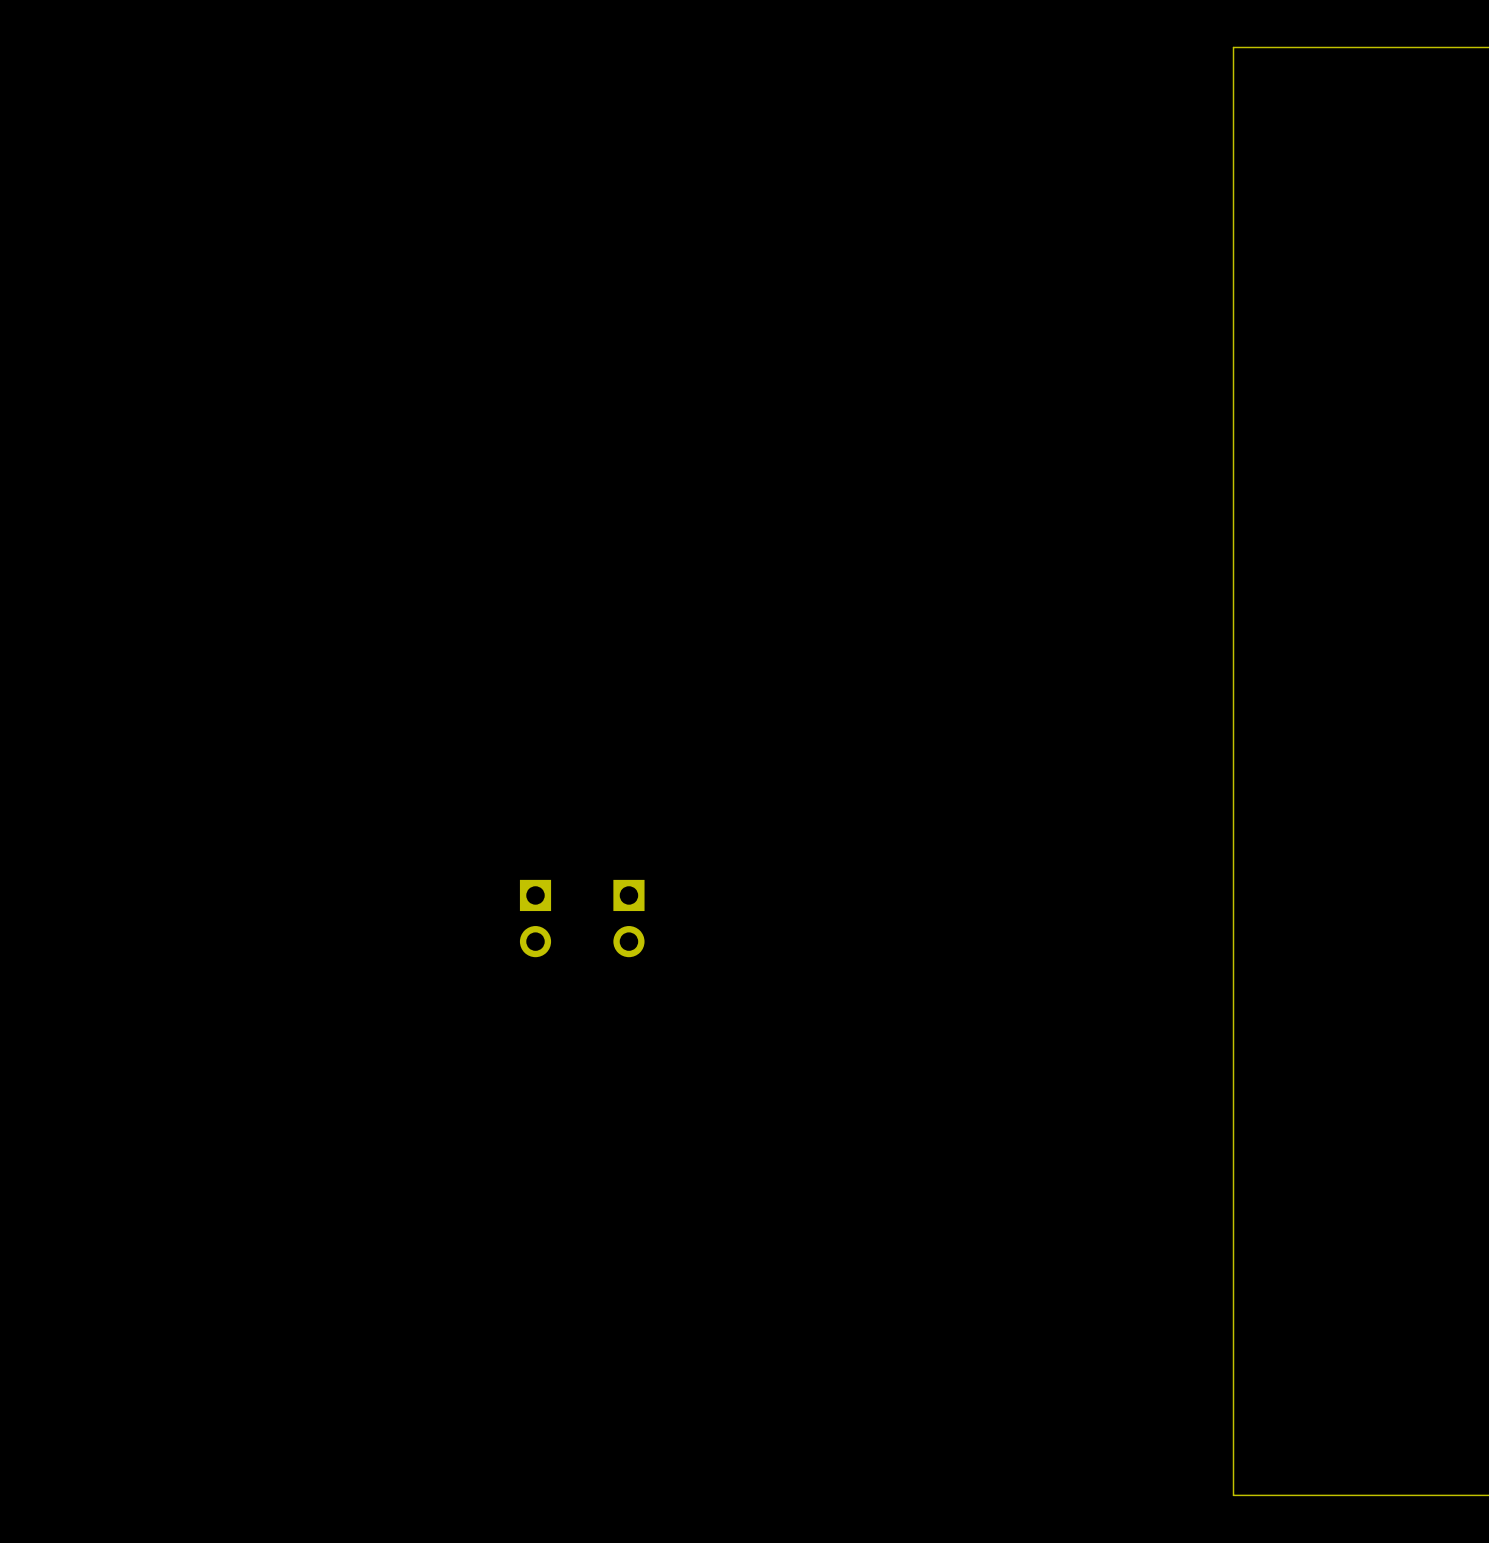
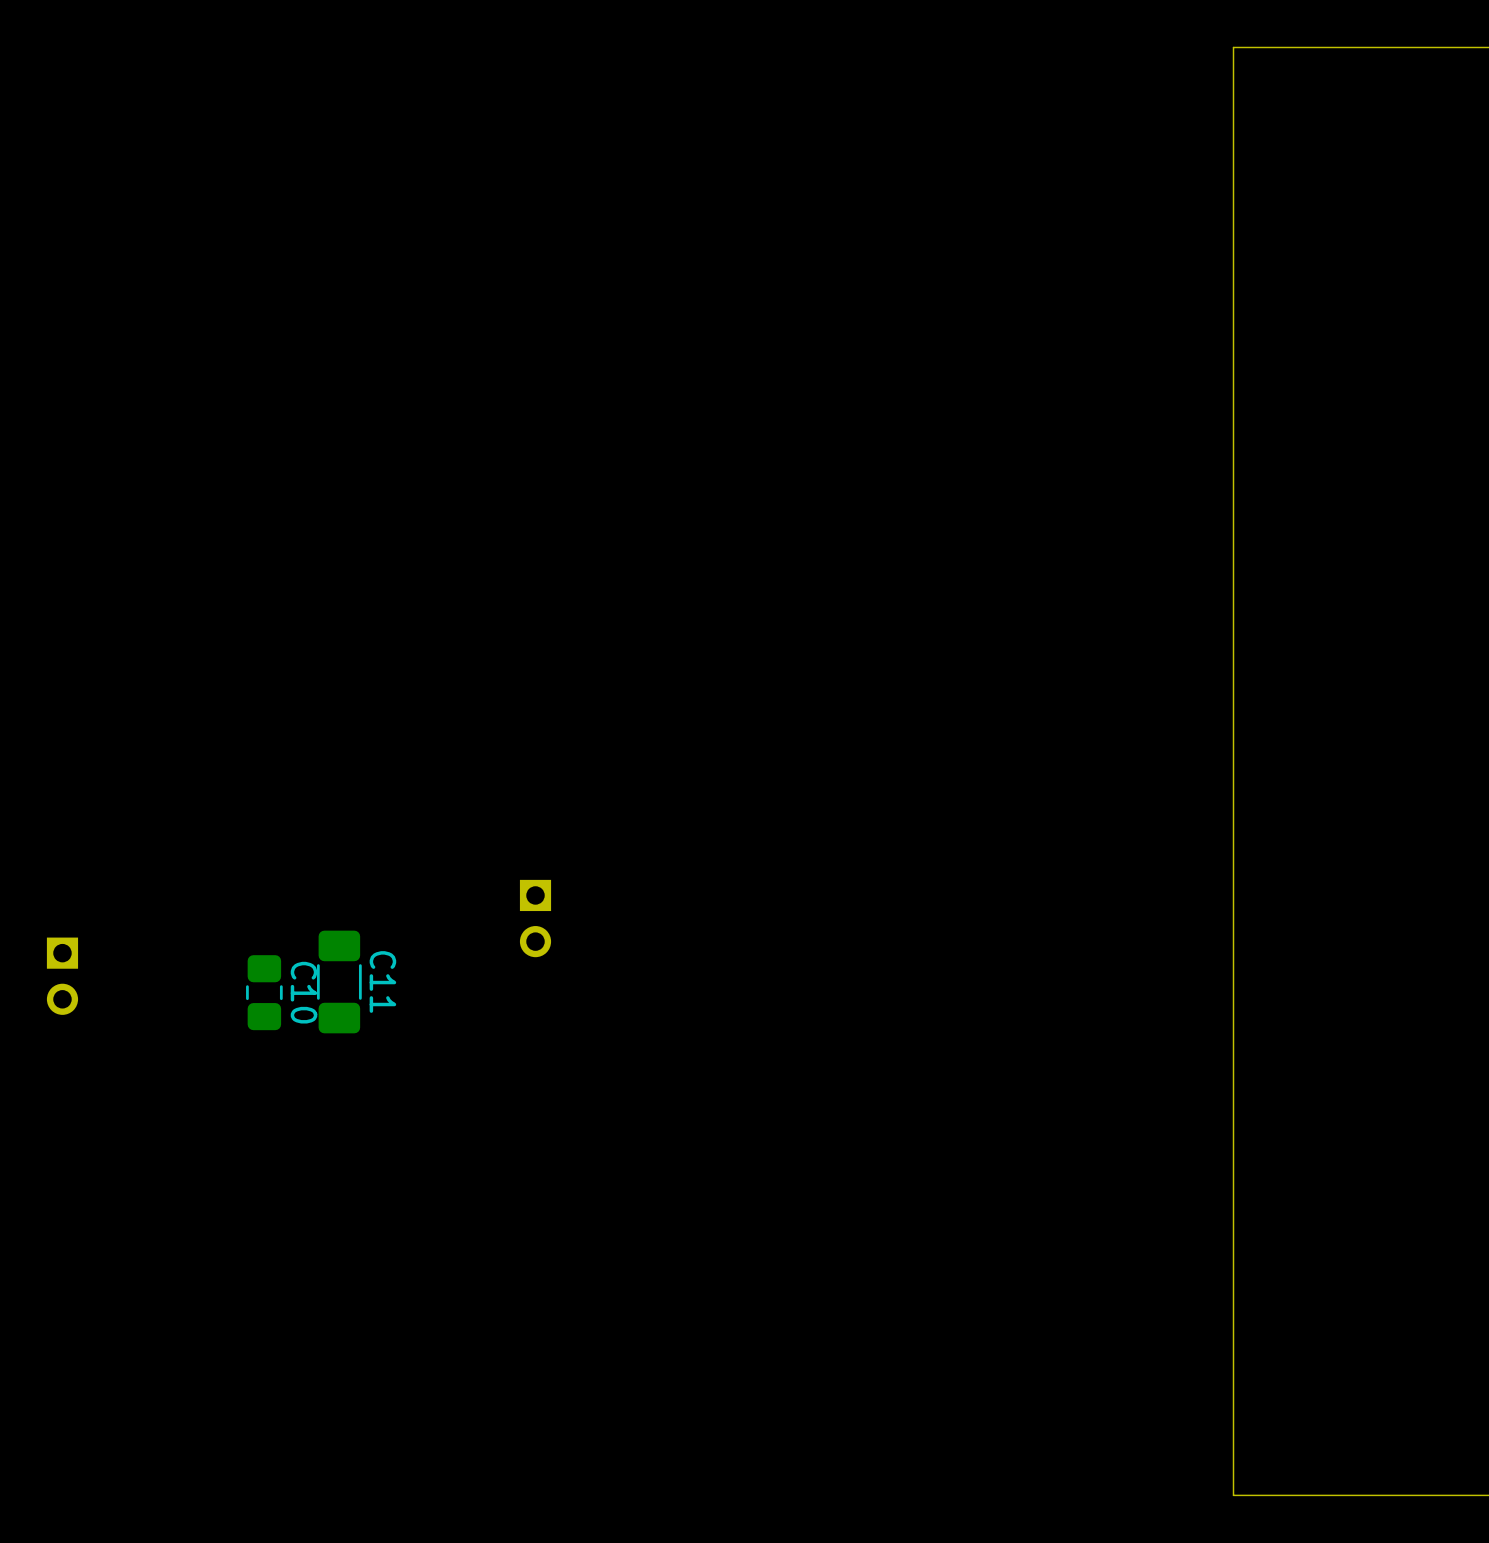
part position: (628, 918) -> (62, 976)
C11: none -> (339, 981)
C10: none -> (264, 992)

